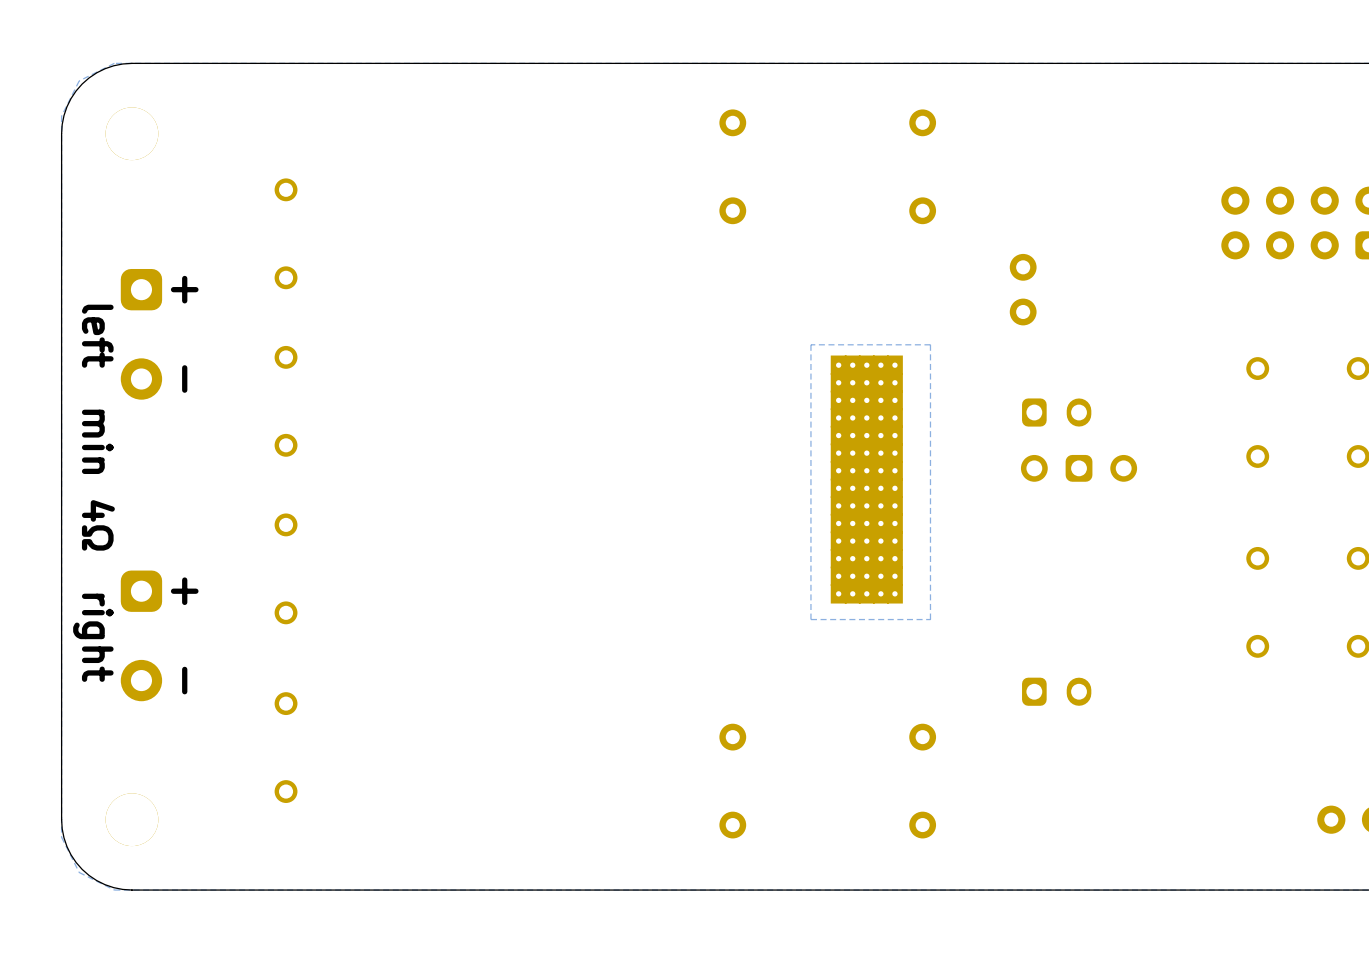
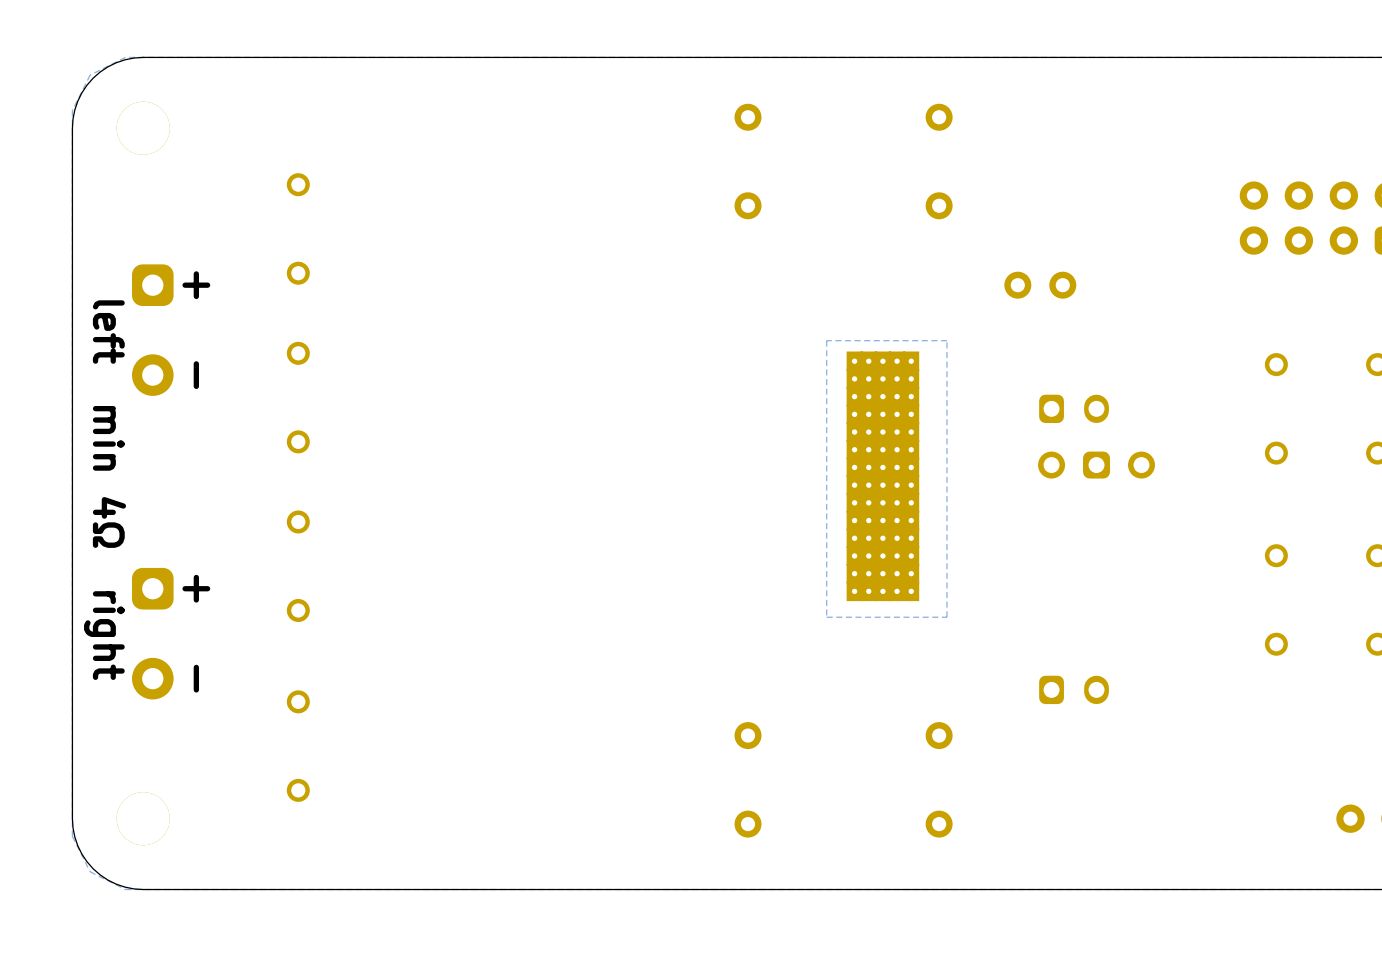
part rotation: 0° (1023, 289) -> 90° clockwise (1040, 285)

